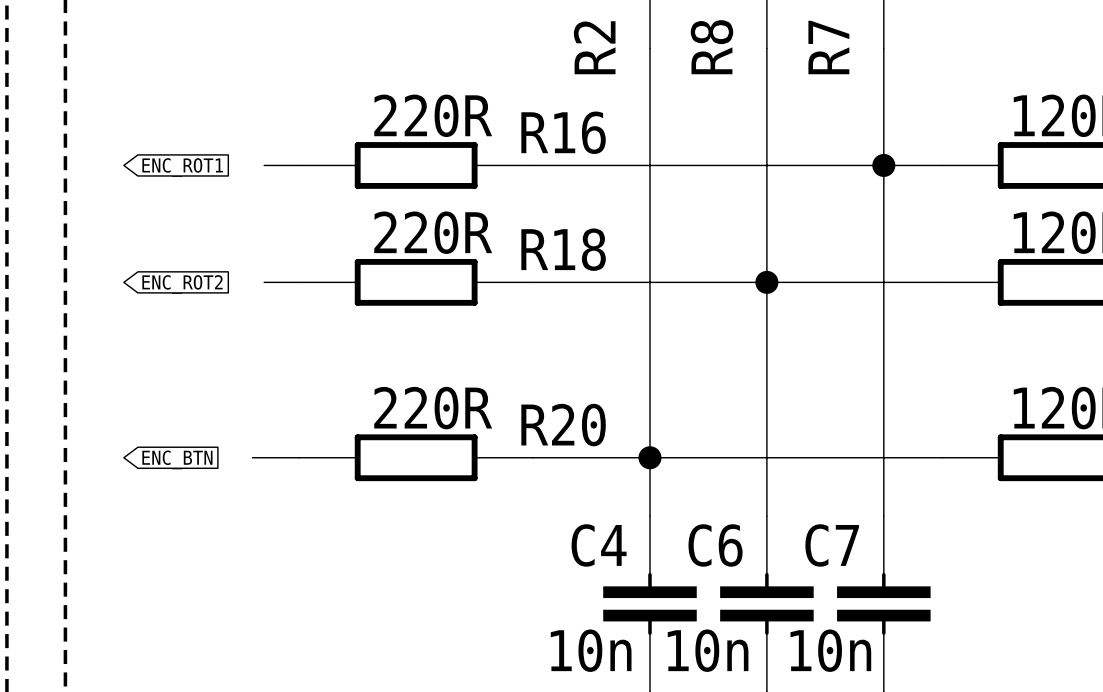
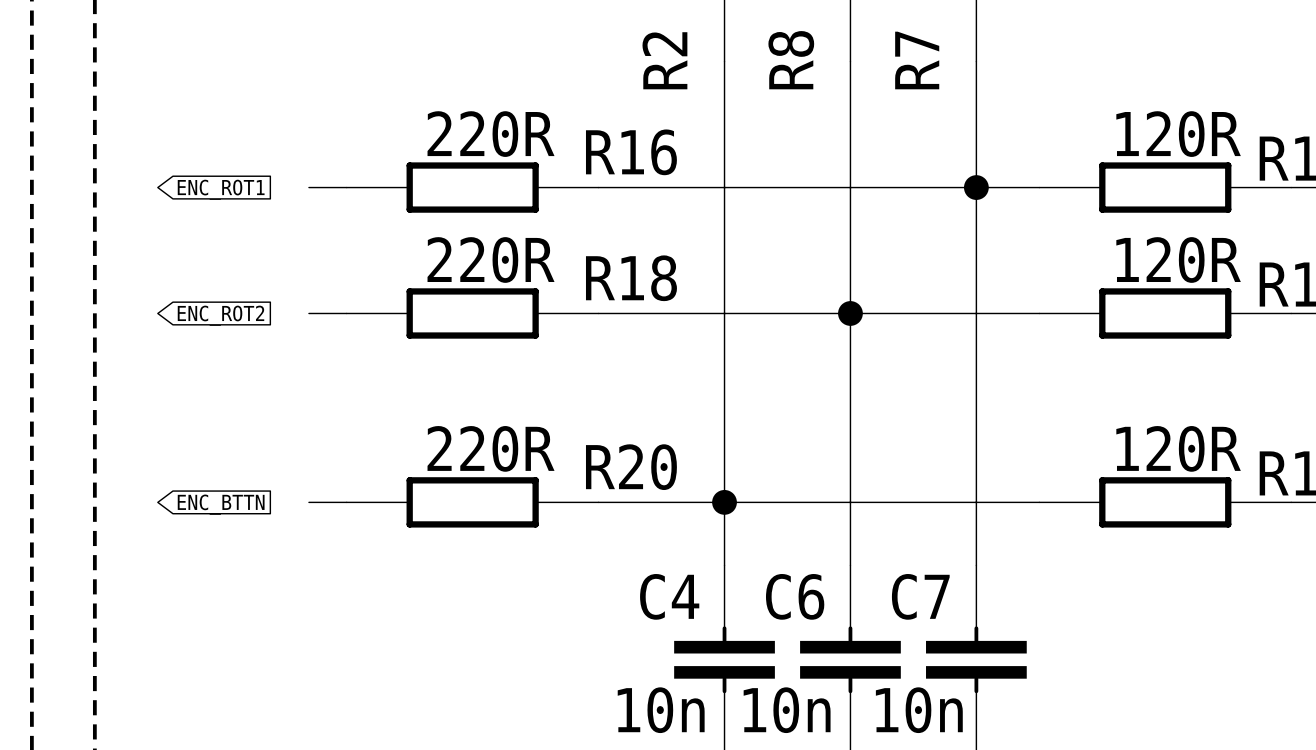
wire: (252, 457) (264, 457) -> none
global label: ENC_BTN (177, 459) -> ENC_BTTN (221, 504)

